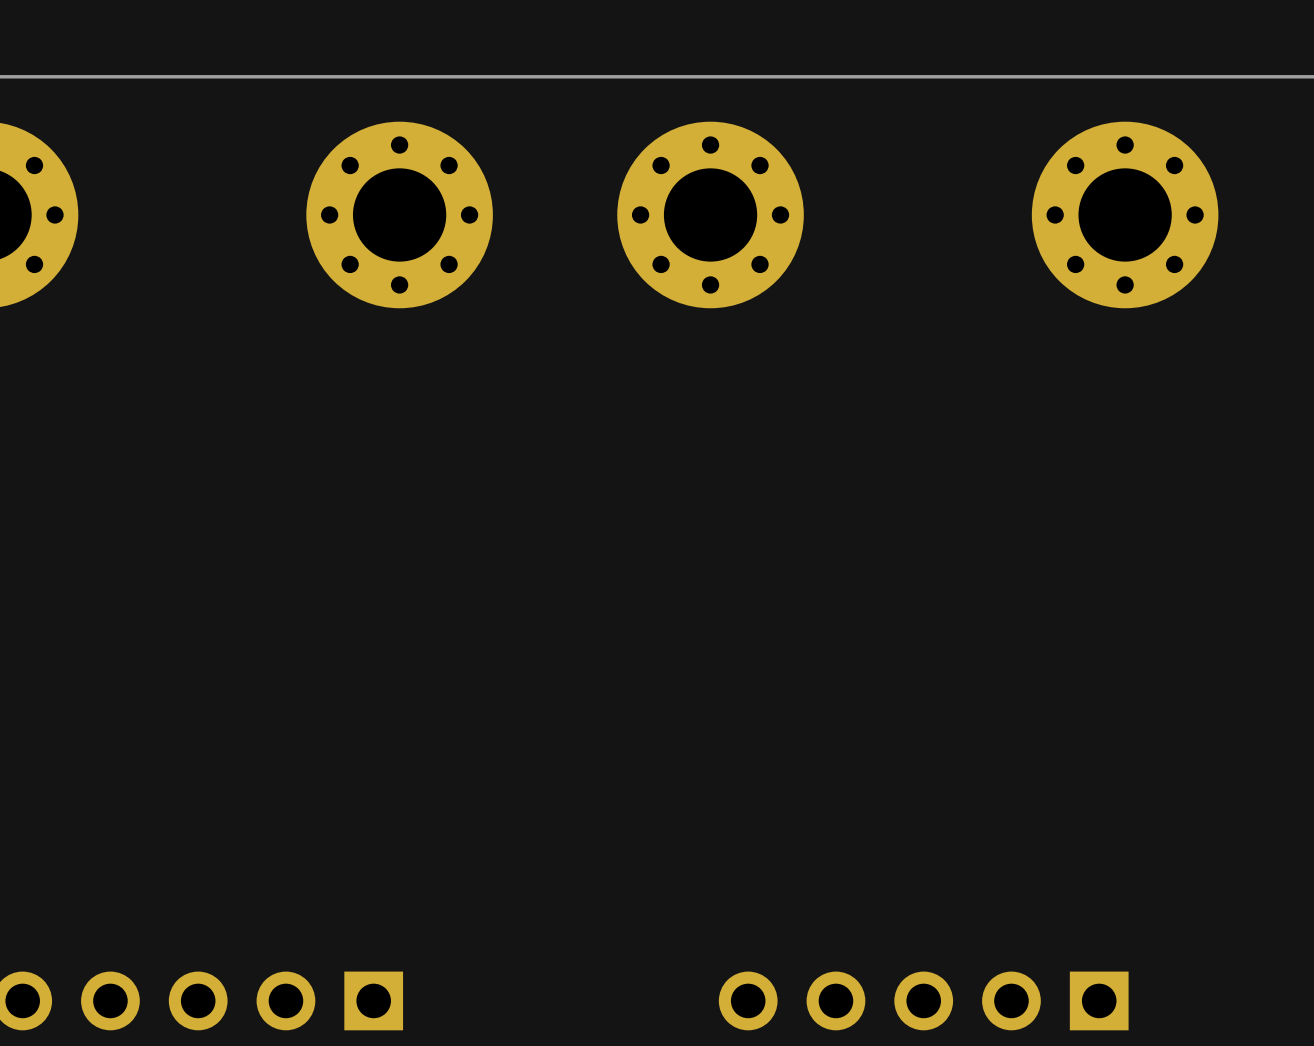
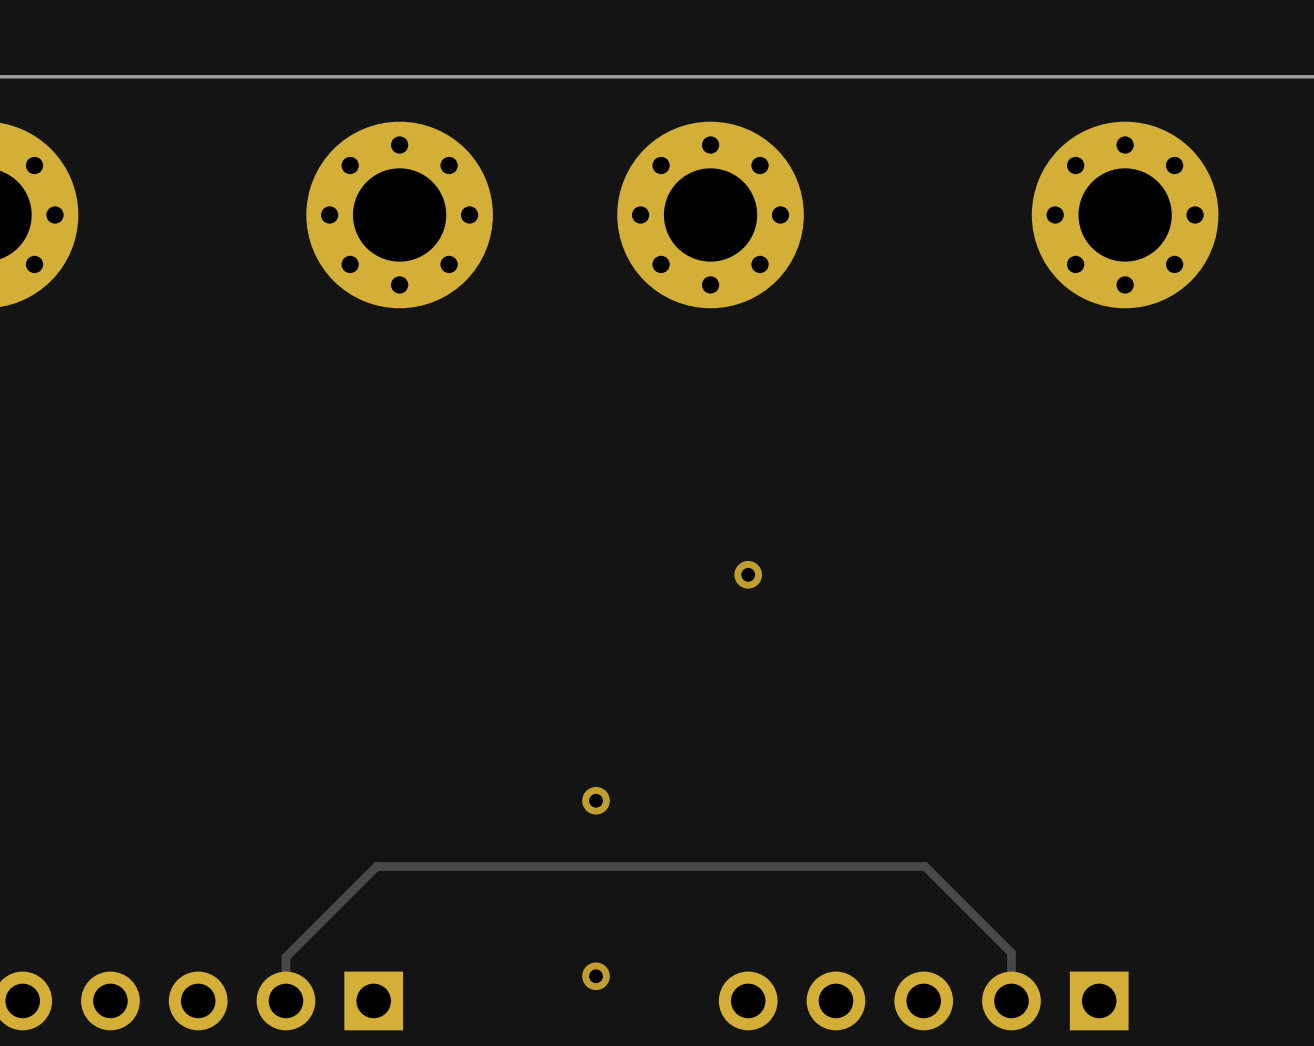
via: none -> (748, 574)
via: none -> (596, 800)
via: none -> (596, 976)
track: none -> (1011, 1000) (1011, 952) (925, 866) (376, 866) (285, 957) (285, 1000)

